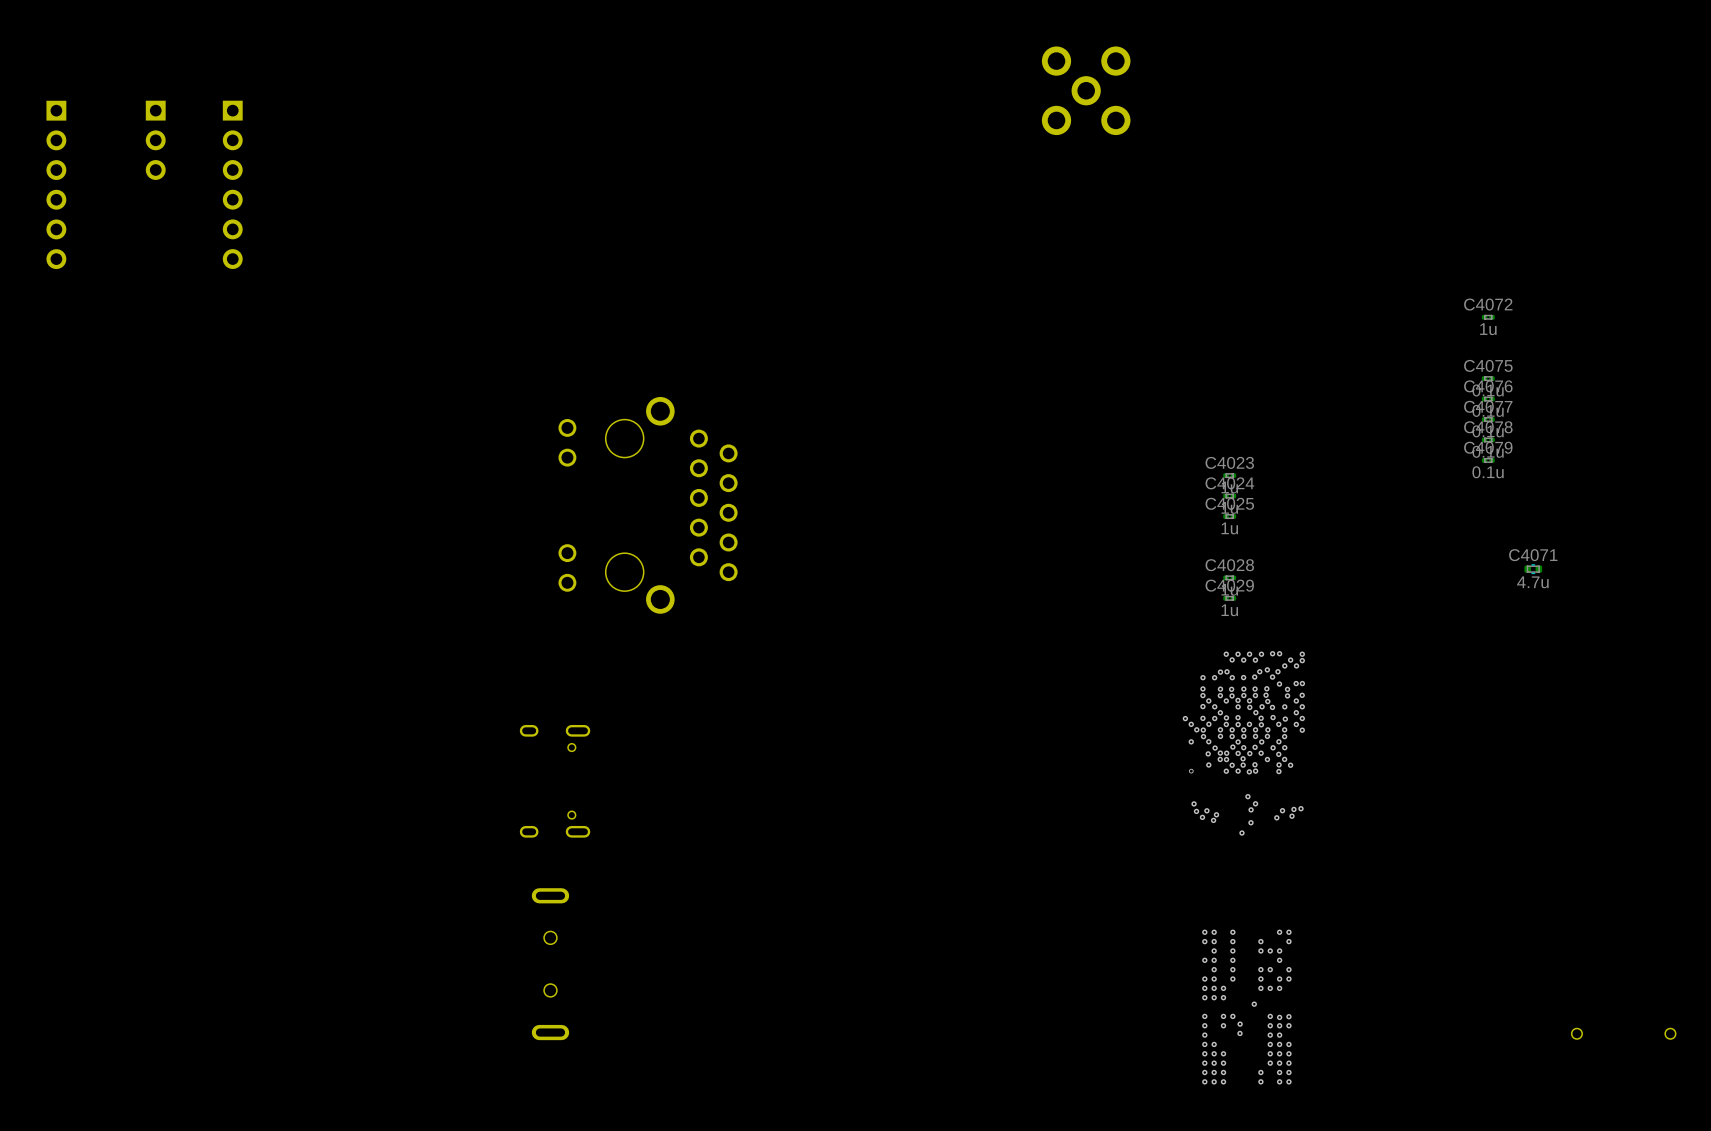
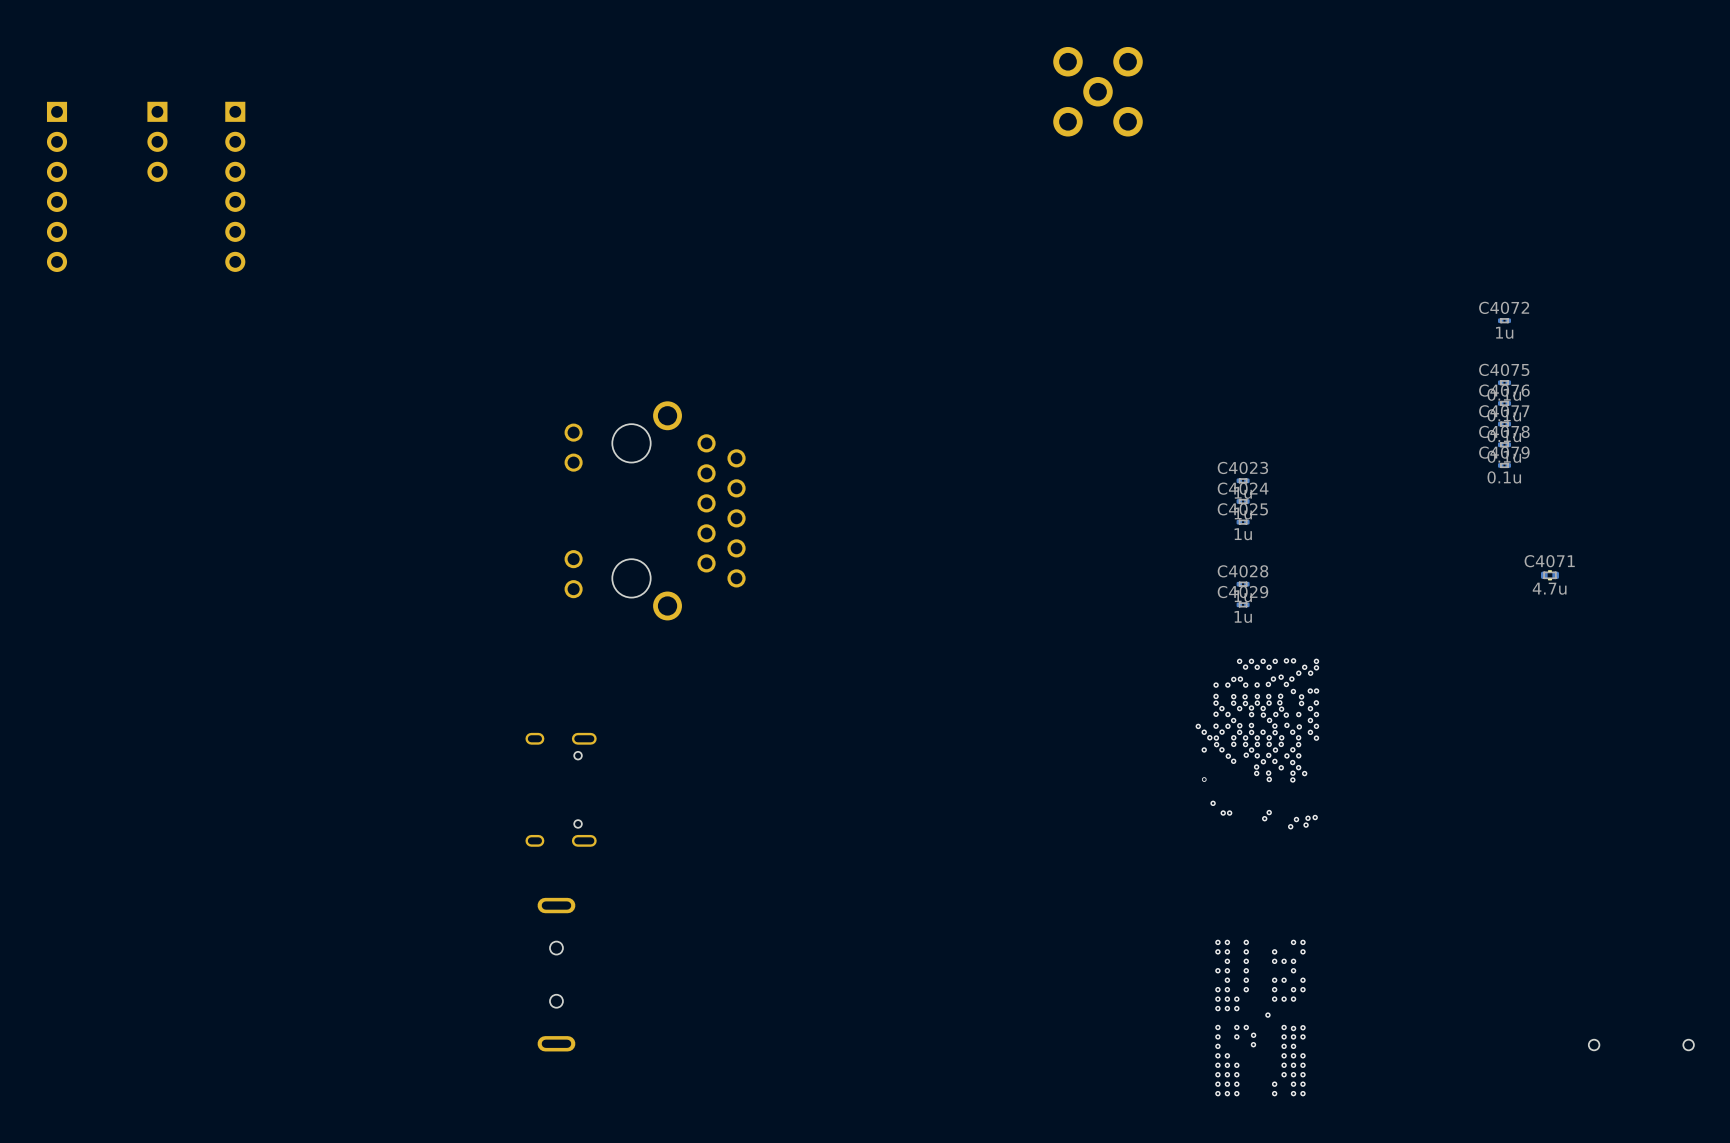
via: (1208, 753) -> none
via: (1226, 753) -> none
via: (1238, 753) -> none
via: (1220, 759) -> none
via: (1226, 759) -> none
via: (1208, 765) -> none
via: (1232, 765) -> none
via: (1226, 771) -> none
via: (1238, 771) -> none
via: (1249, 771) -> none
via: none -> (1213, 803)
via: (1247, 796) -> none
via: (1194, 803) -> none
via: none -> (1223, 813)
via: none -> (1229, 813)
via: (1206, 810) -> none
via: (1196, 811) -> none
via: (1216, 814) -> none
via: (1202, 817) -> none
via: (1213, 820) -> none
via: (1250, 822) -> none
via: (1241, 833) -> none

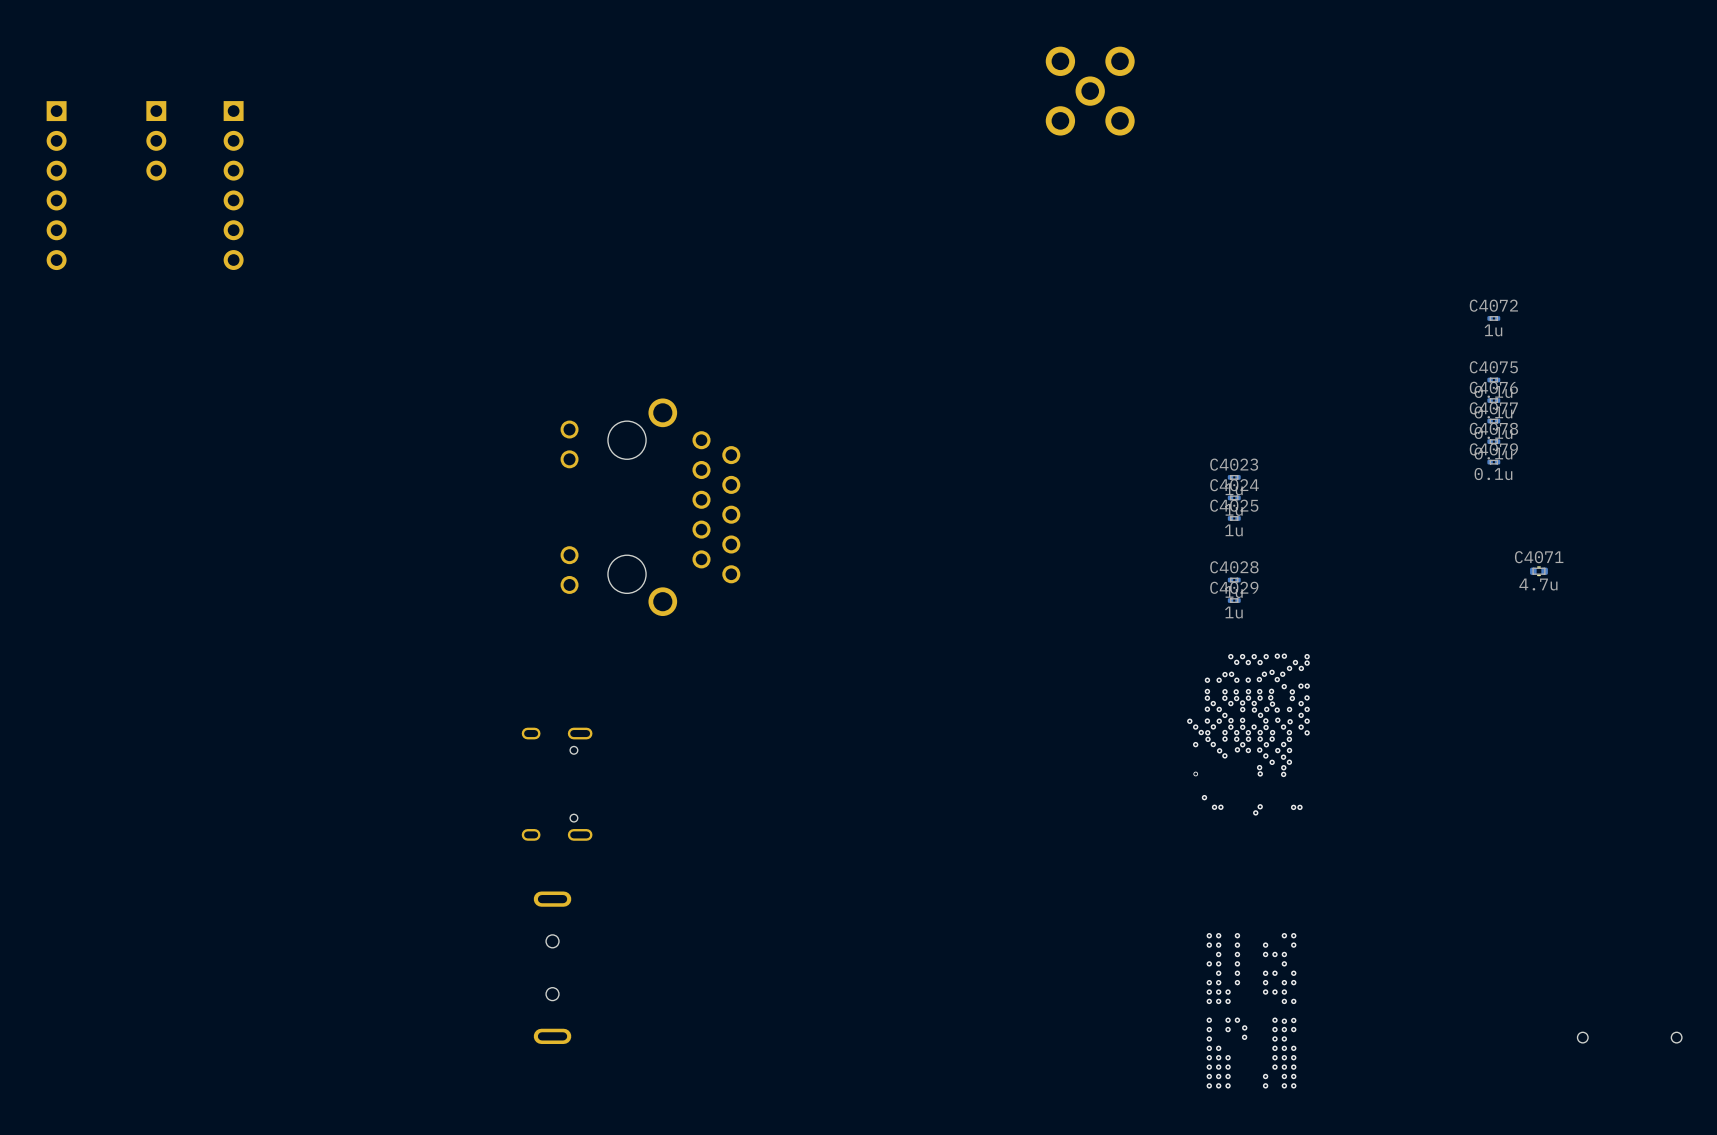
via: (1263, 761) -> none
via: (1256, 767) -> none
via: (1256, 773) -> none
via: (1304, 773) -> none
via: none -> (1293, 807)
via: none -> (1299, 807)
via: (1315, 817) -> none
via: (1308, 818) -> none
via: (1296, 819) -> none
via: (1306, 825) -> none
via: (1290, 826) -> none
via: none -> (1284, 1001)
via: none -> (1293, 1001)
via: (1267, 1015) -> none

